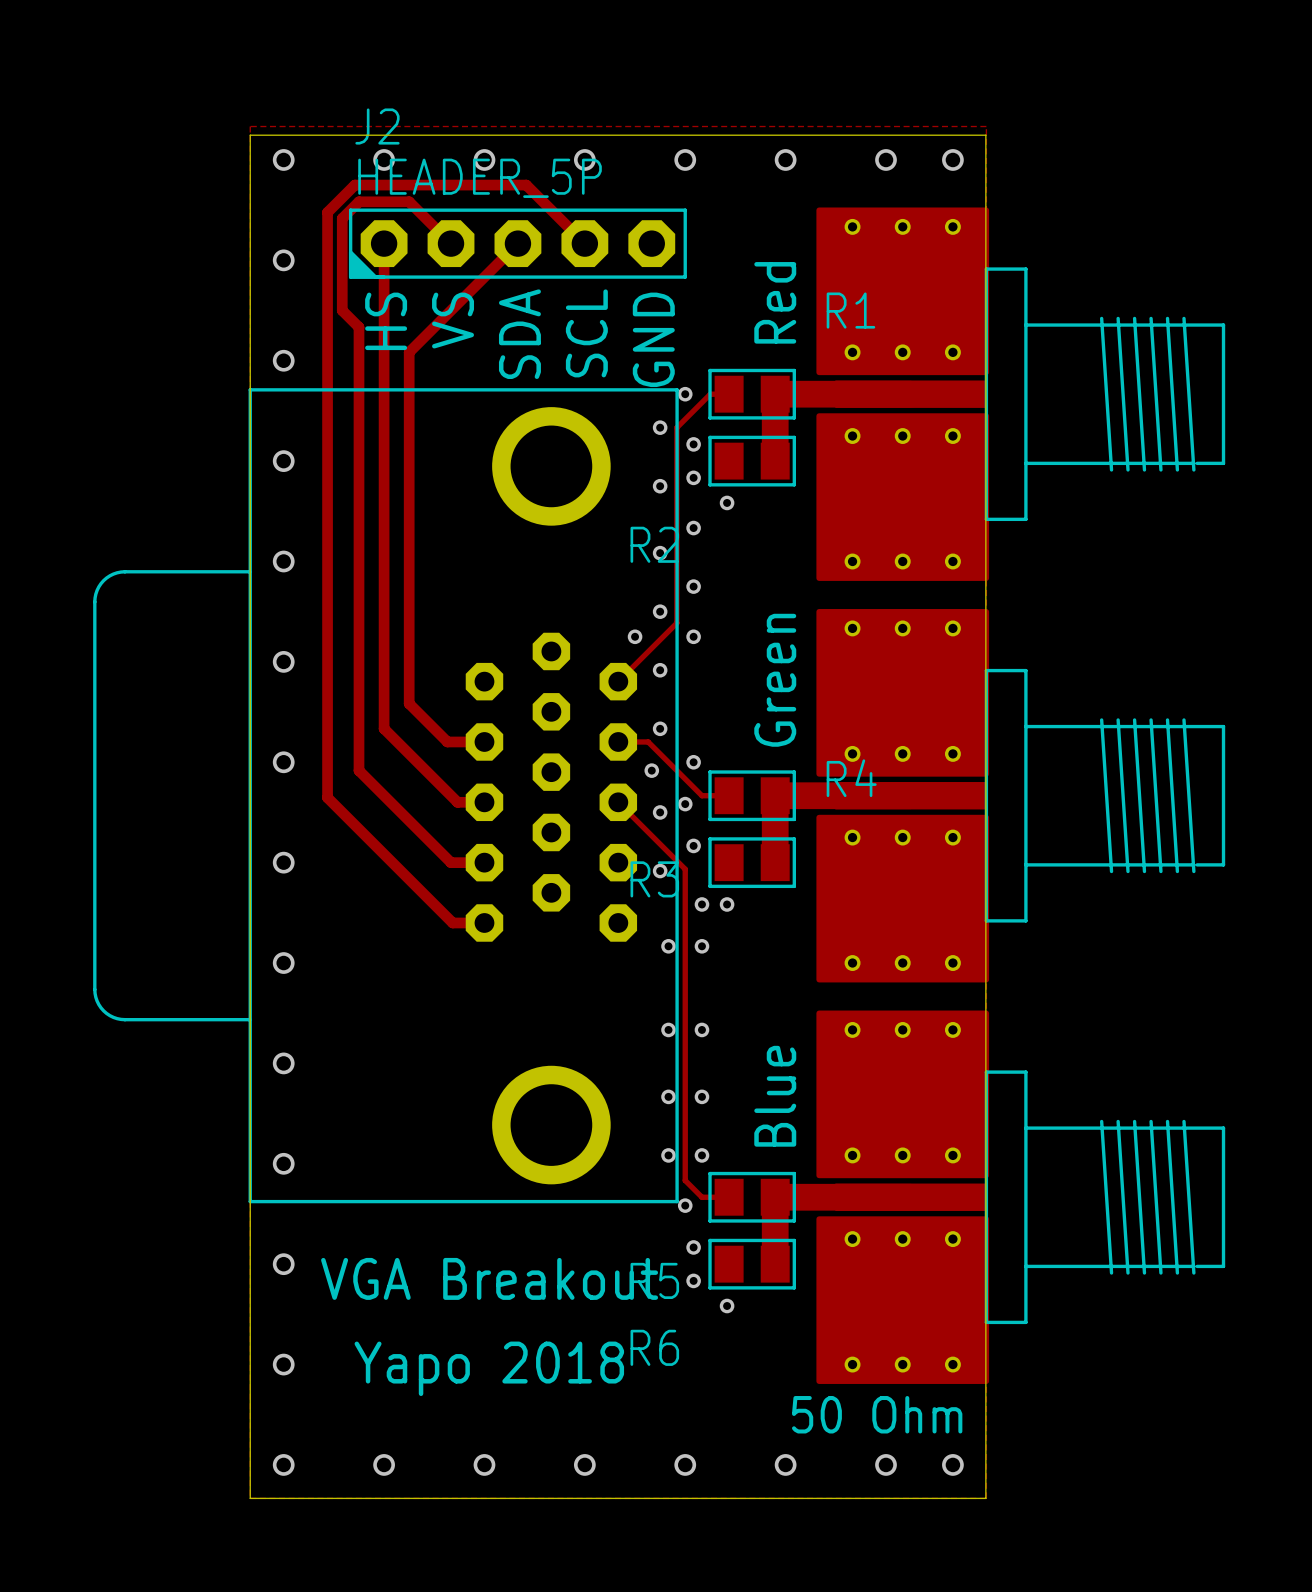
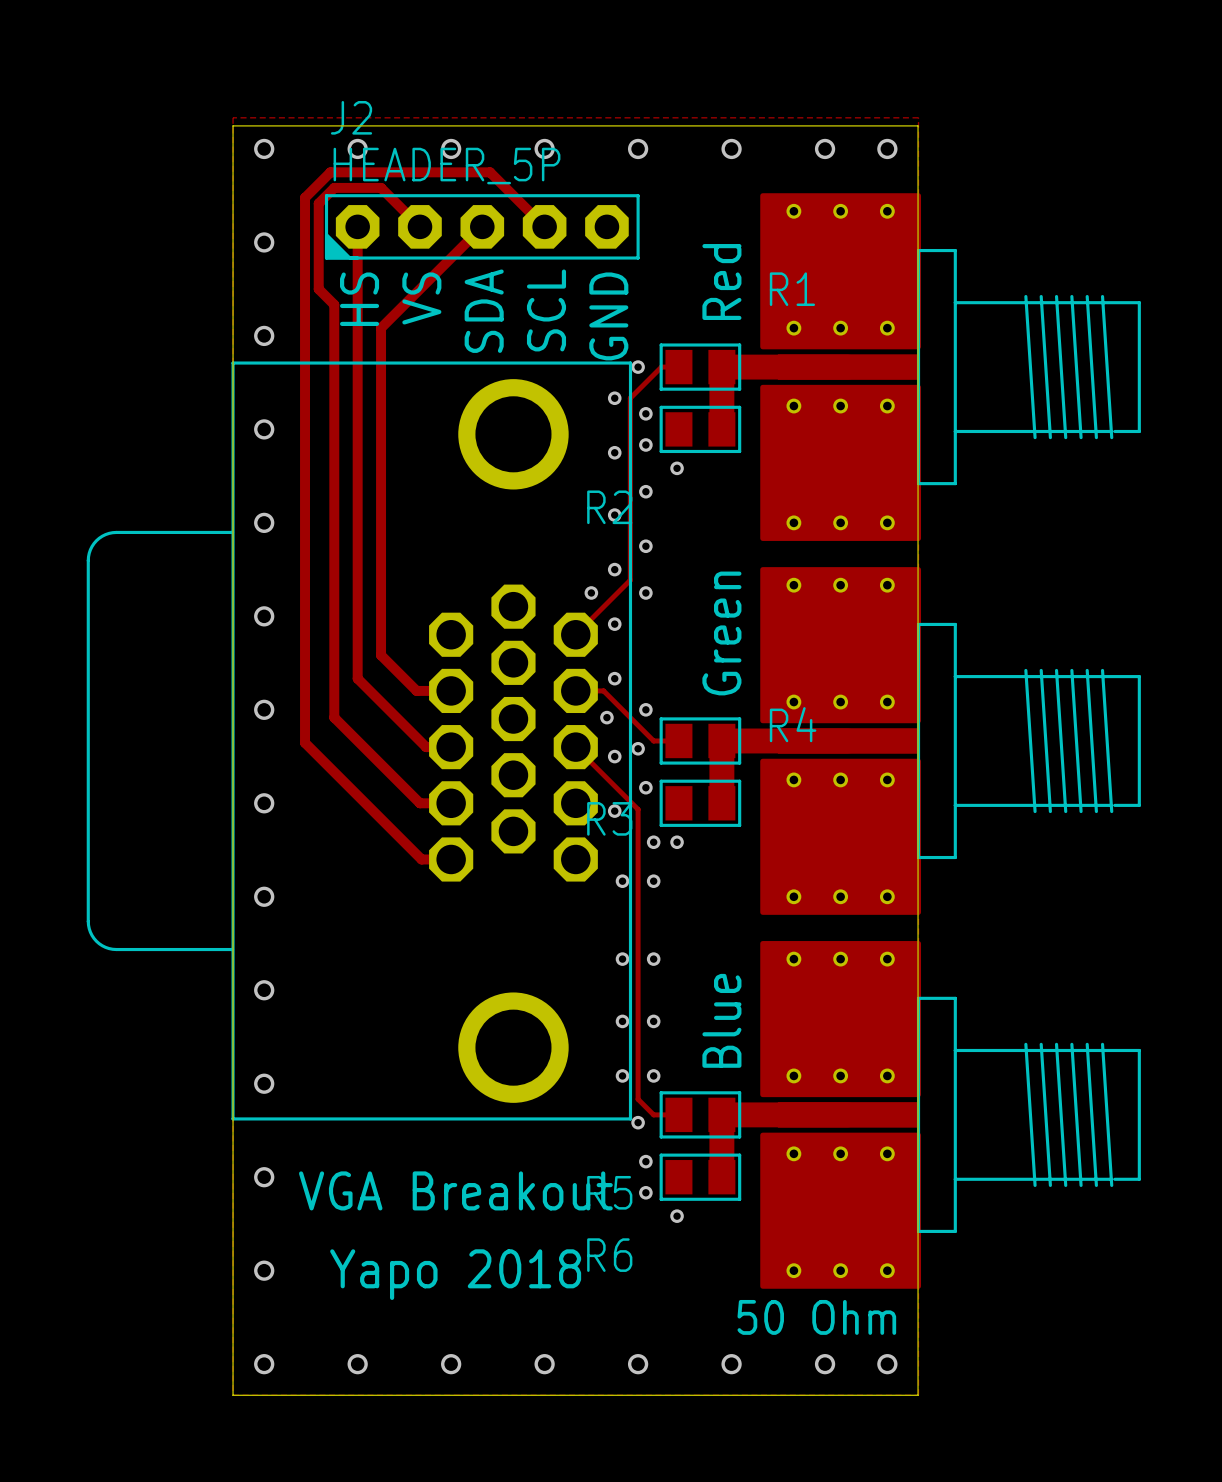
part footprint: [93, 388, 679, 1204] -> [86, 361, 633, 1121]

